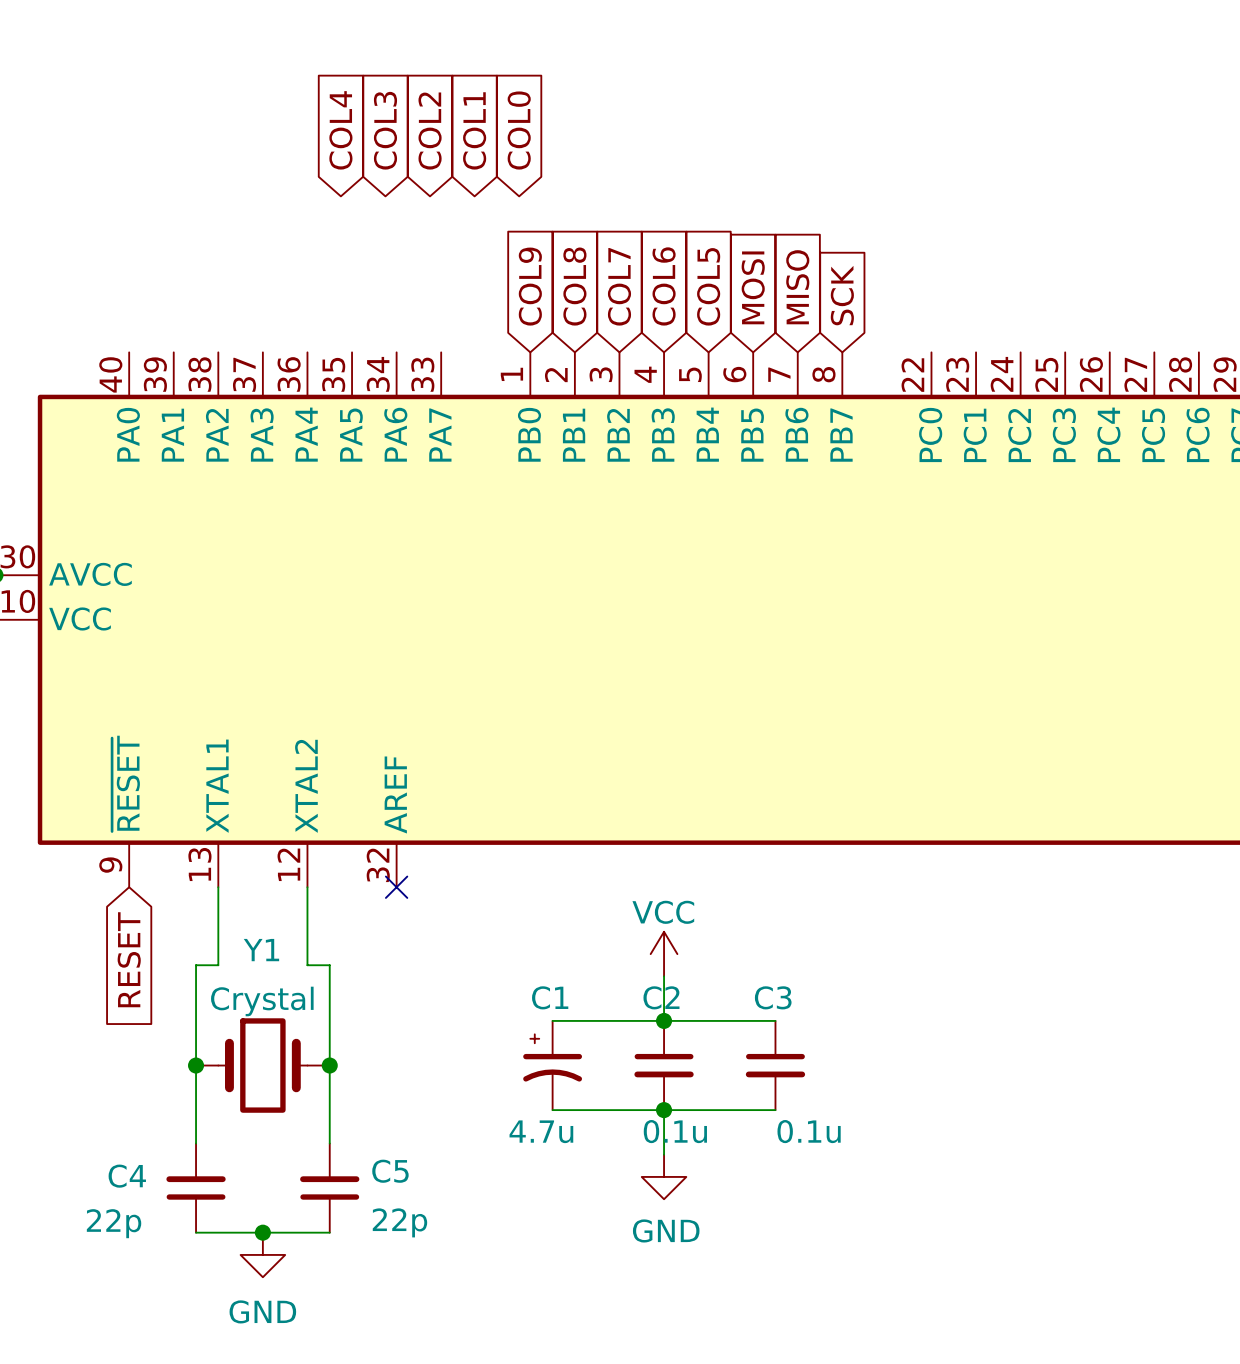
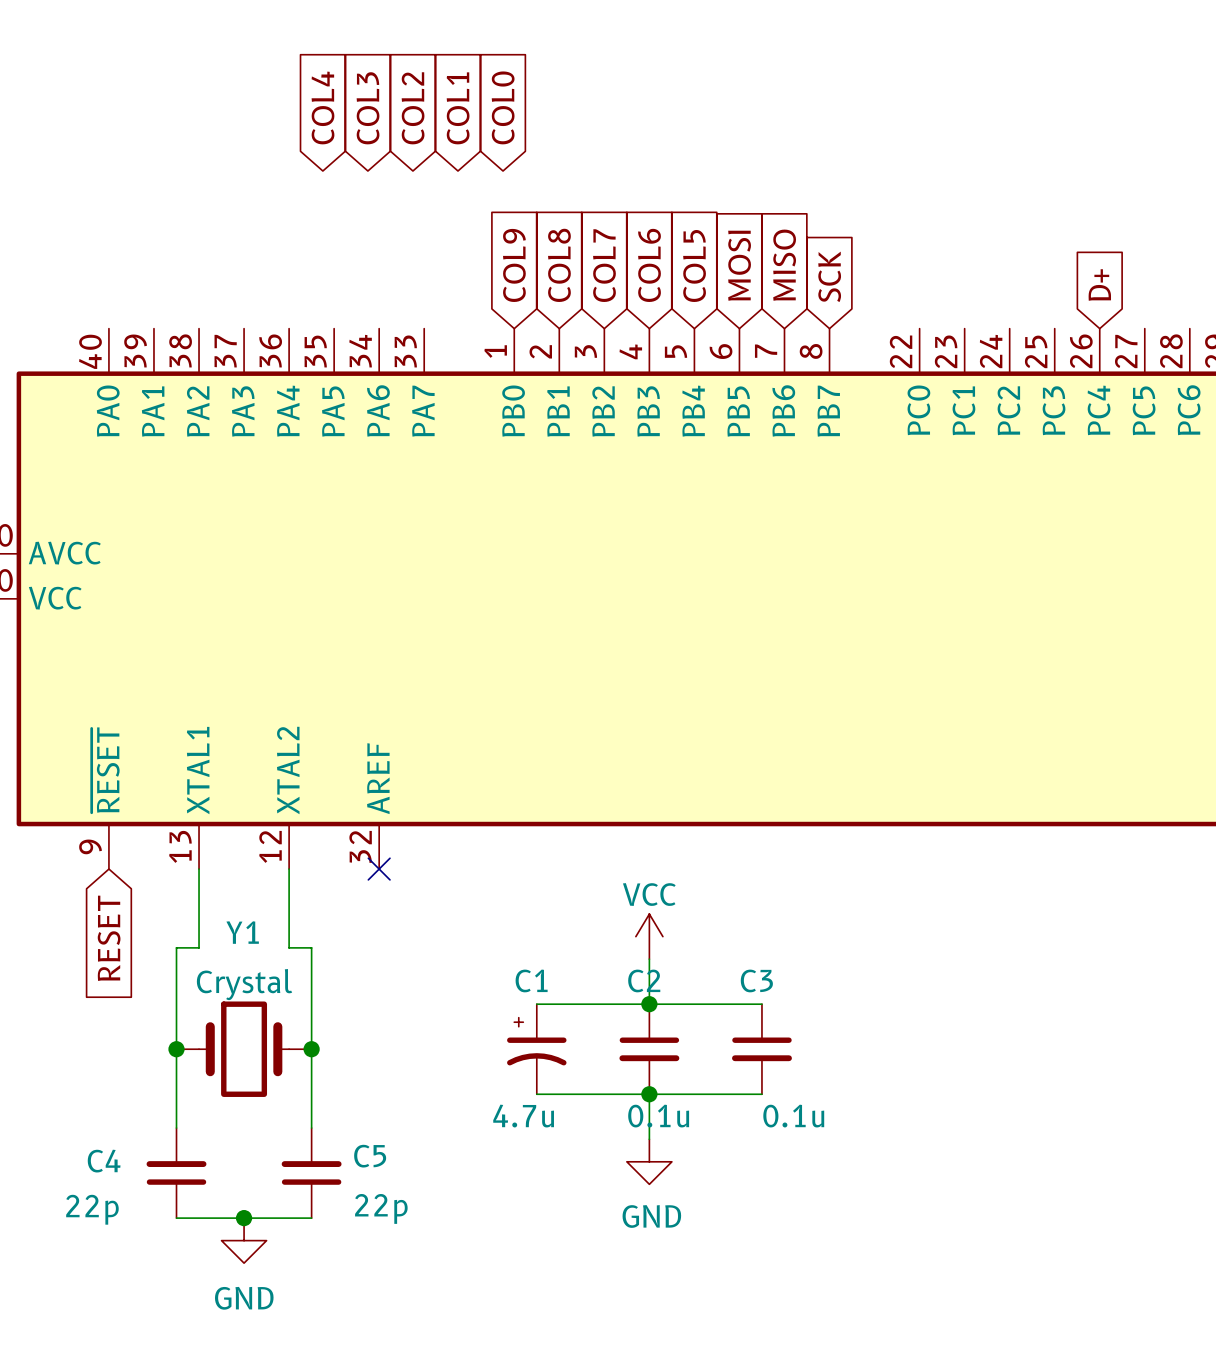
global label: none -> D+ (1099, 285)

